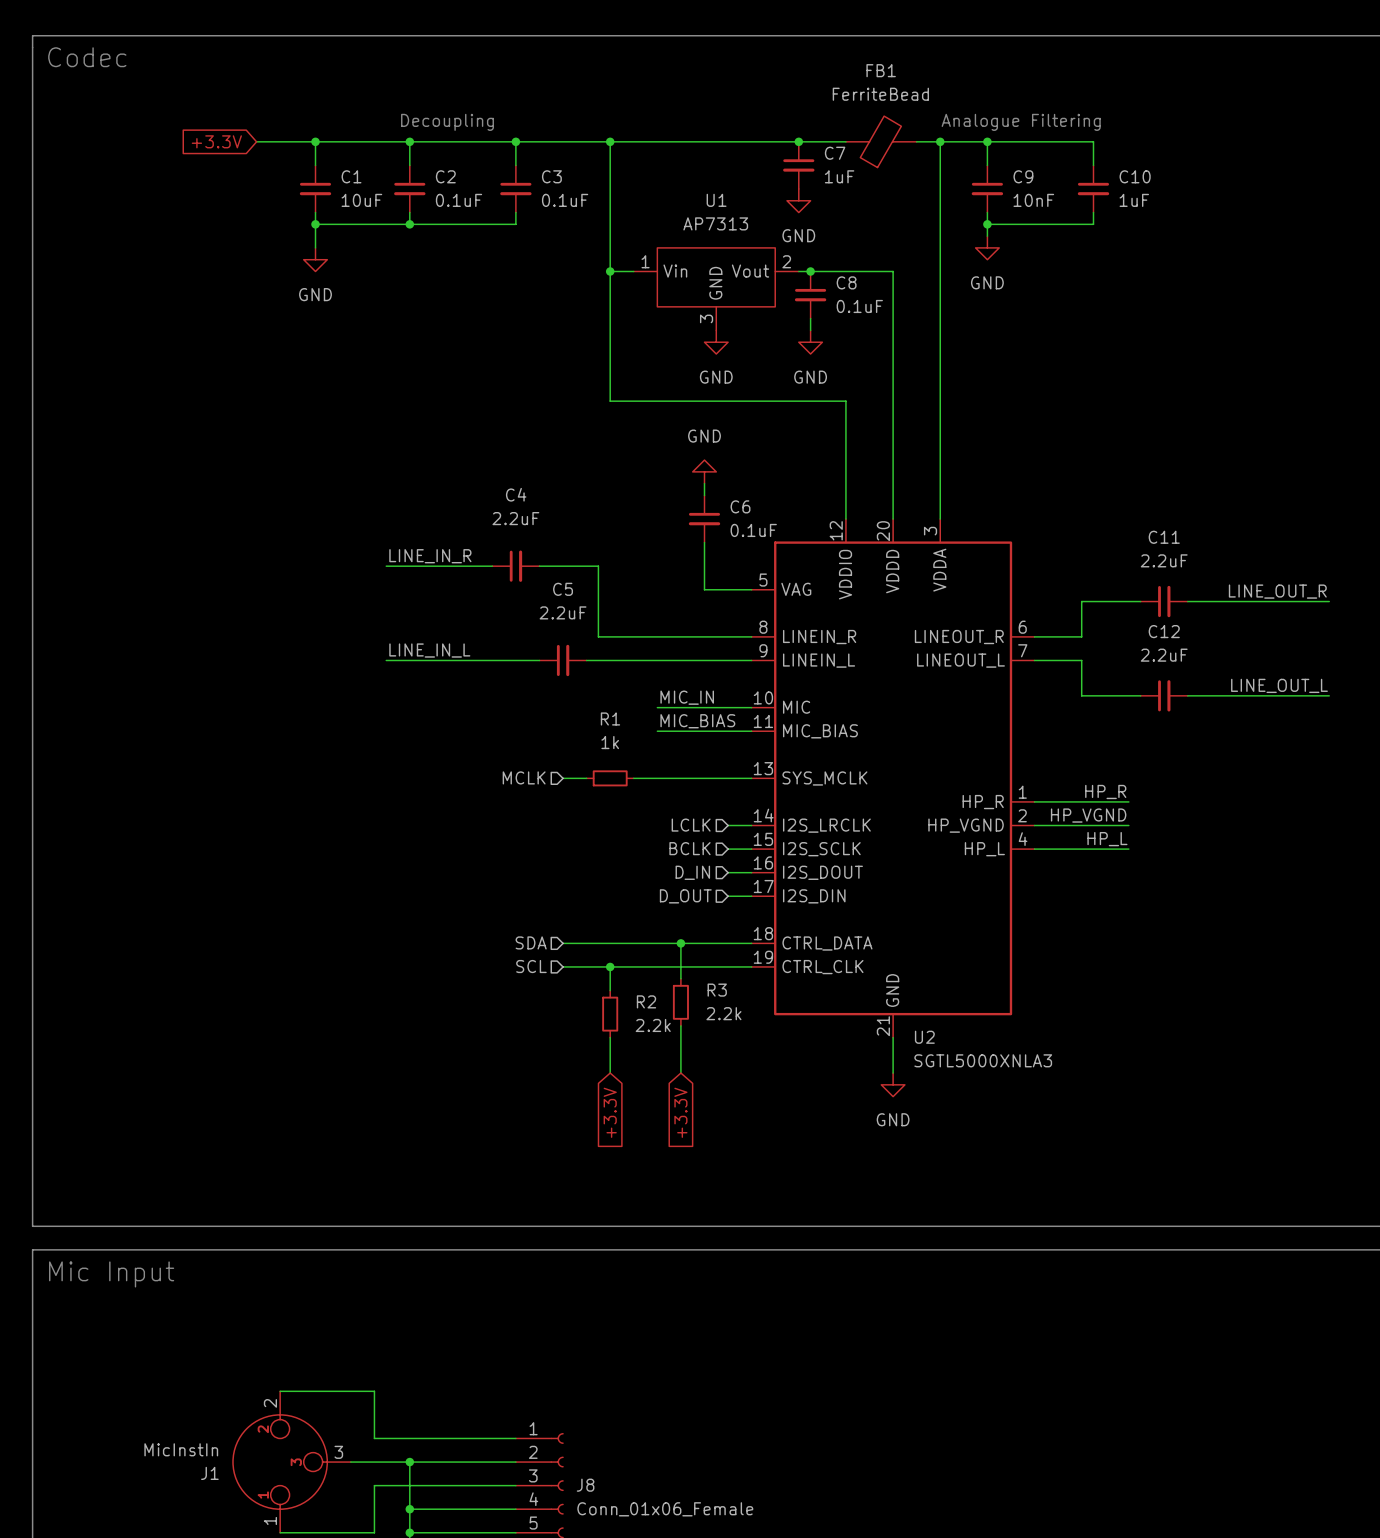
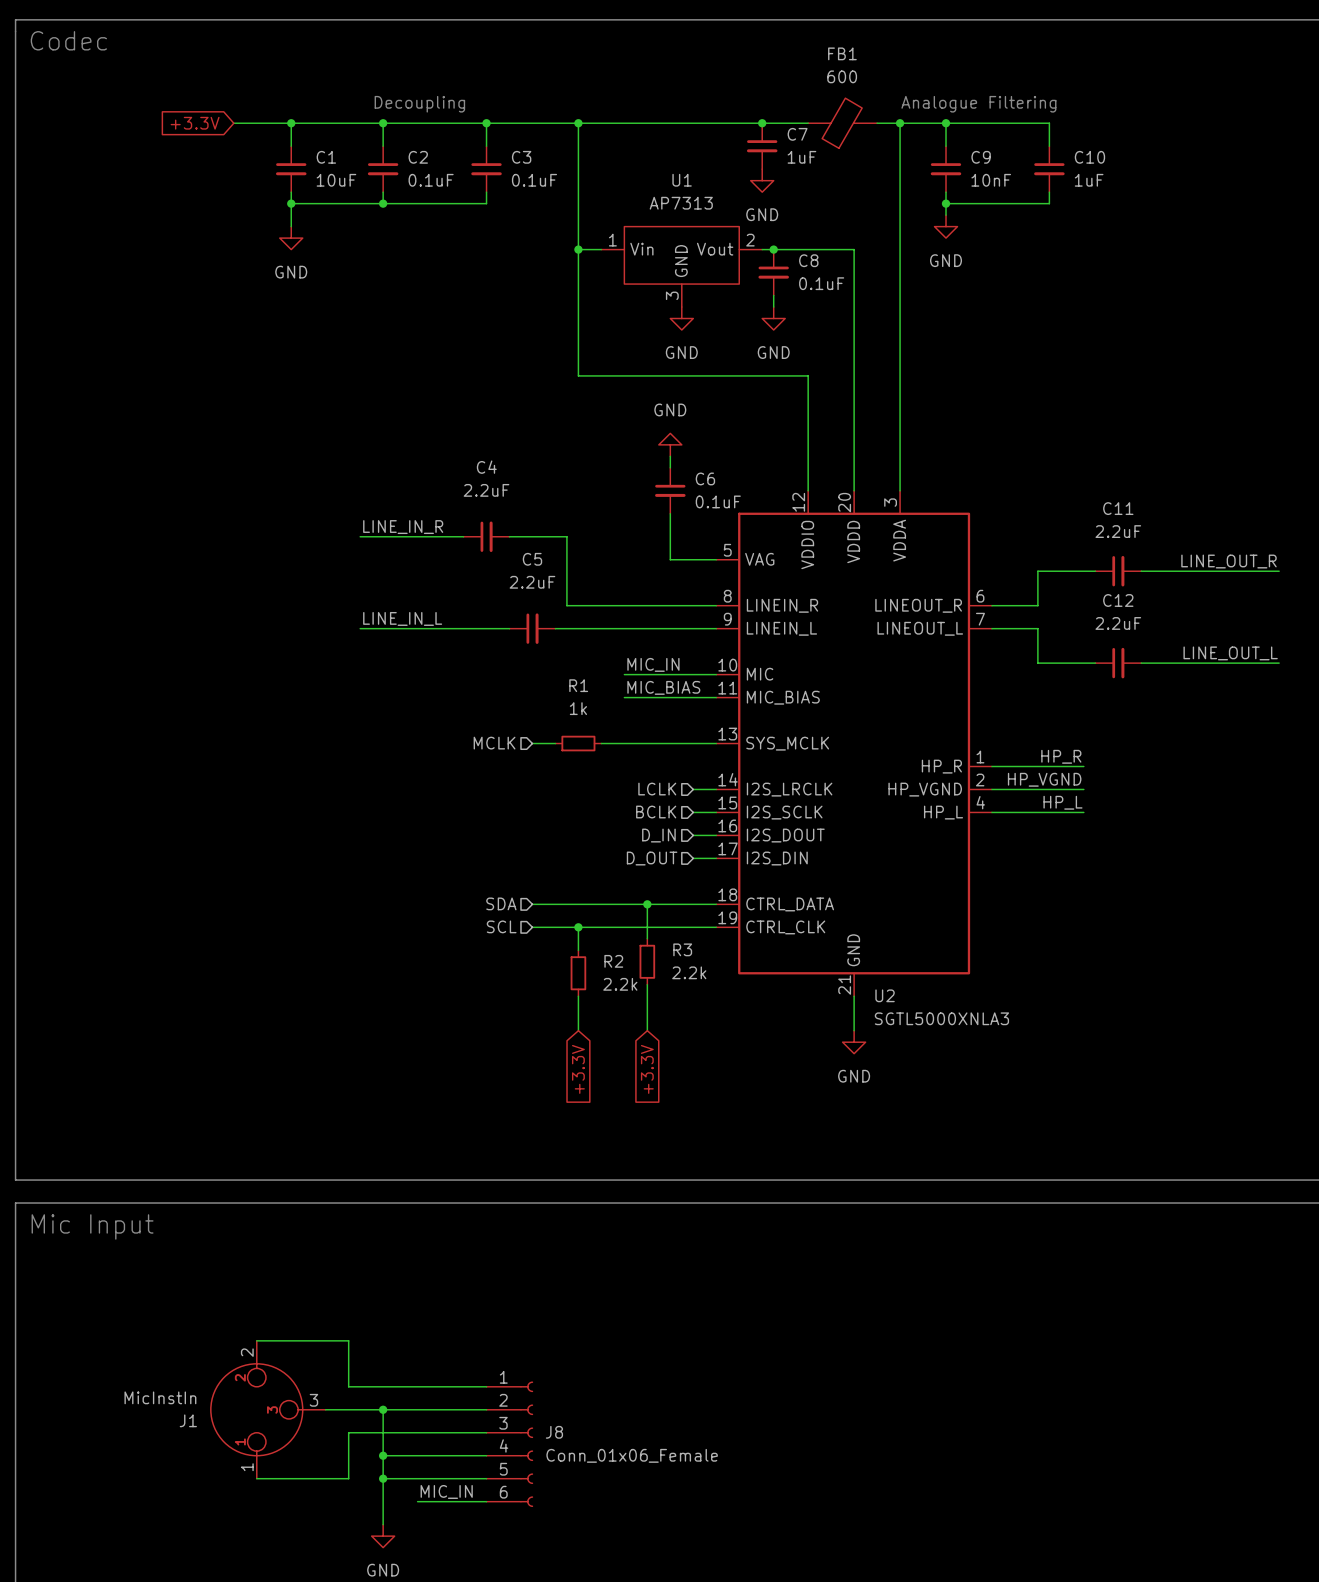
FB1 value: FerriteBead (880, 94) -> 600 (842, 76)

